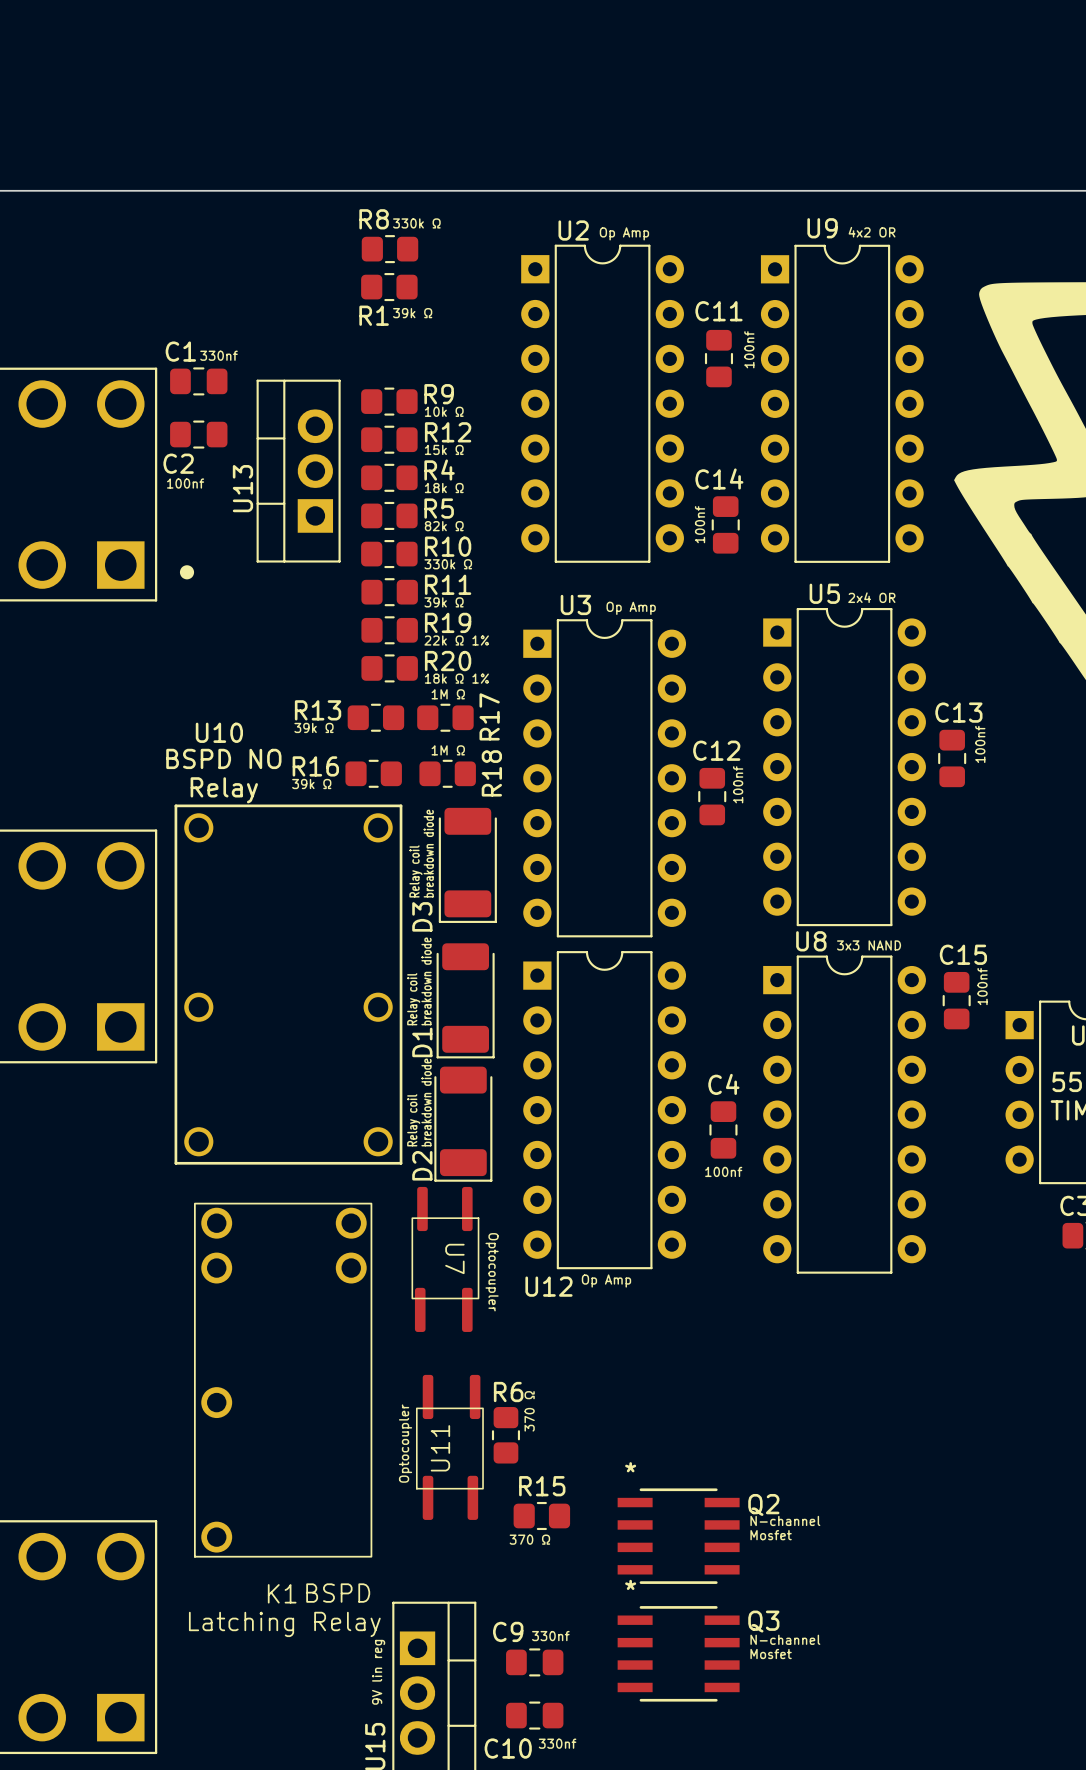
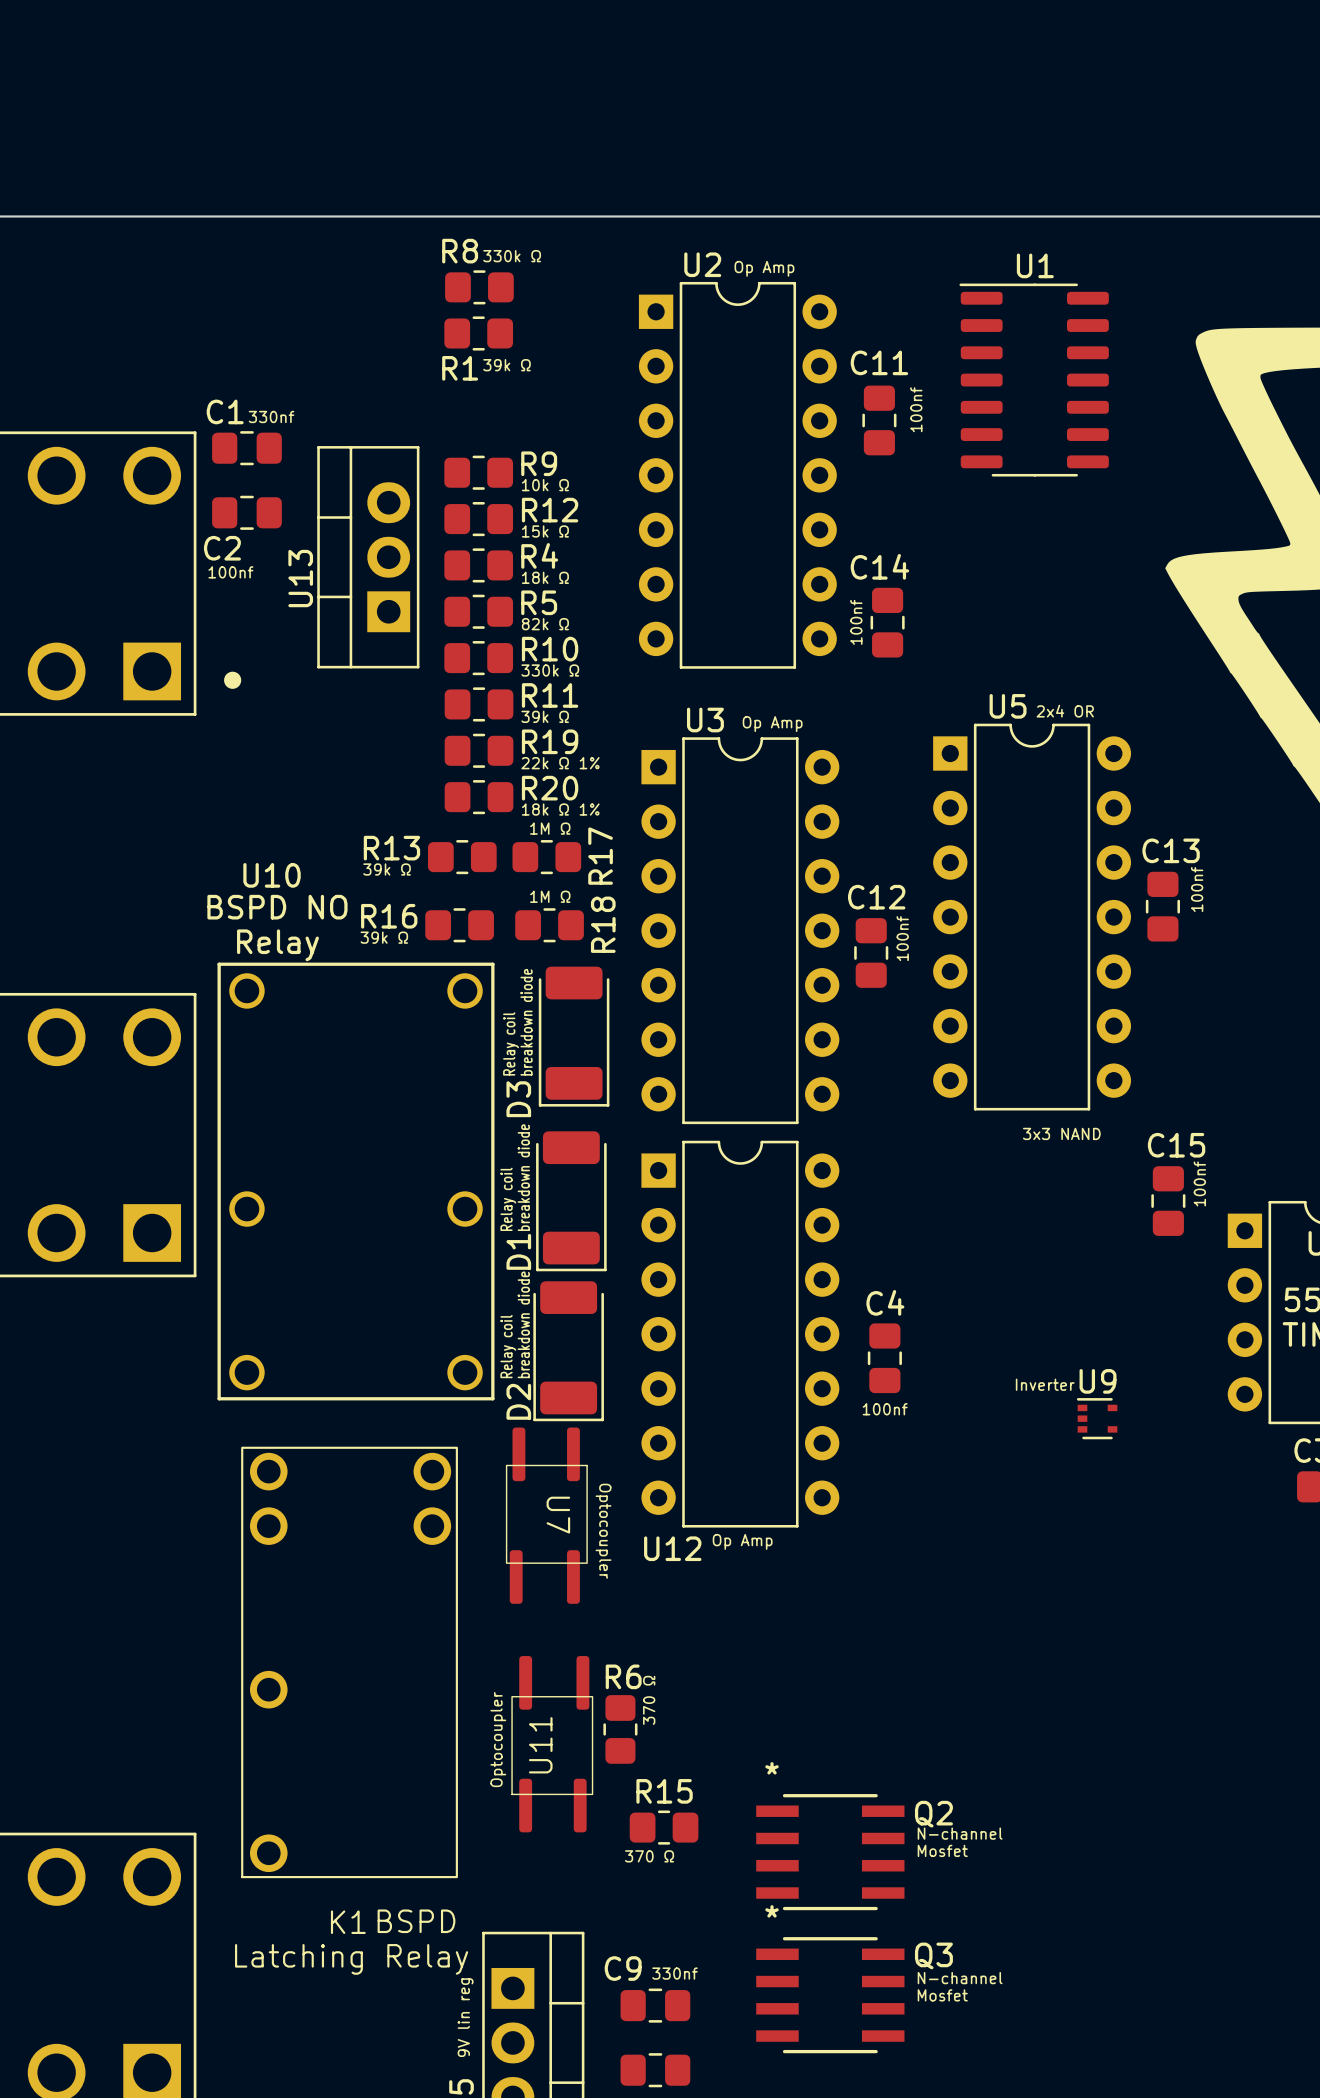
U9 name position: U9 (822, 228) -> U9 (1098, 1381)
text: 4x2 OR (872, 232) -> none
U9 footprint: [760, 244, 924, 563] -> [1076, 1398, 1118, 1440]
U1: none -> (1034, 380)
U8: (844, 1114) -> none
text: none -> Inverter (1045, 1384)

